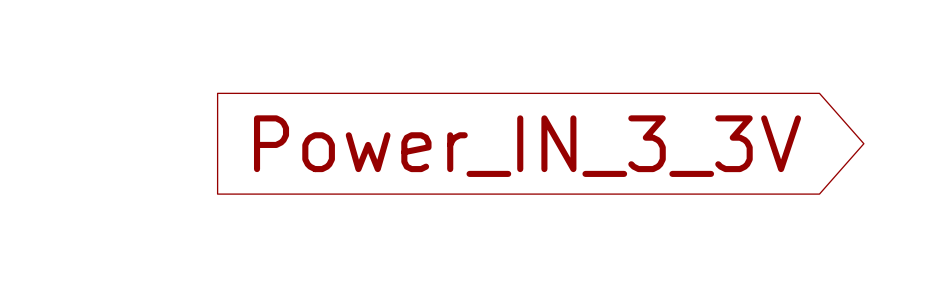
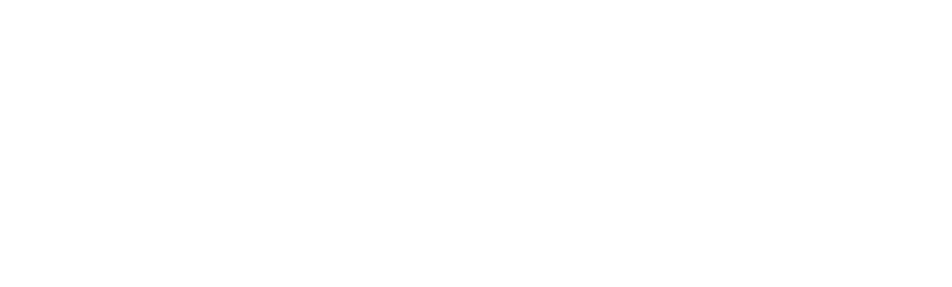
global label: Power_IN_3_3V (527, 146) -> none

